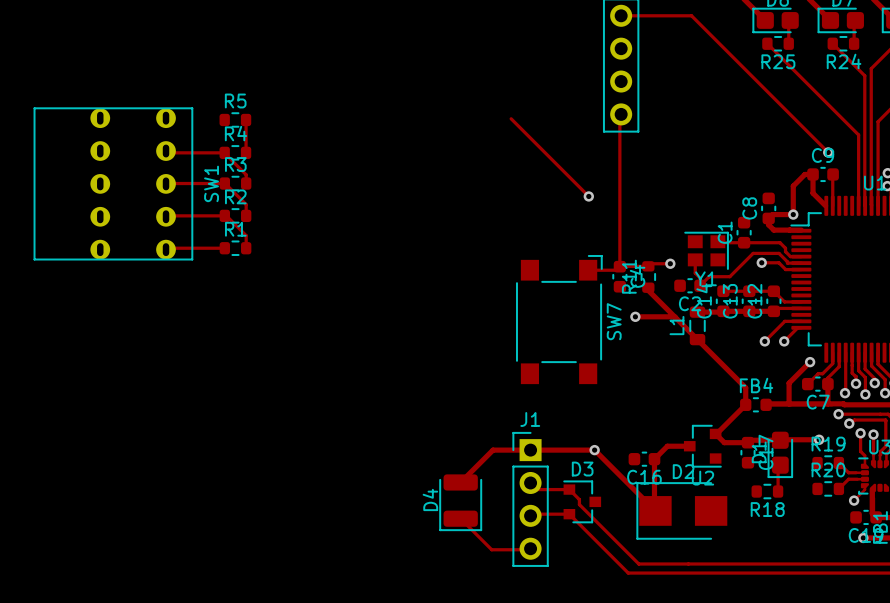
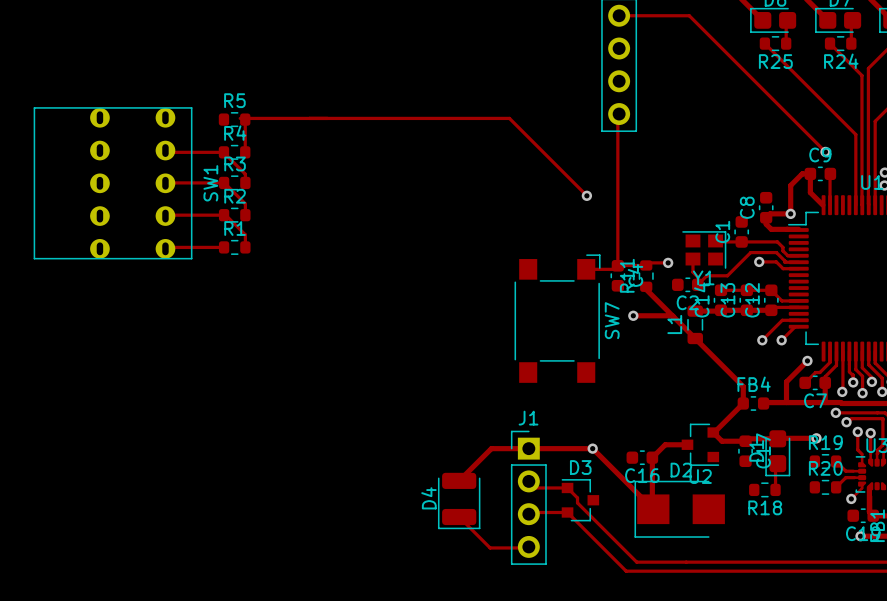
track: none -> (240, 118) (509, 118)

